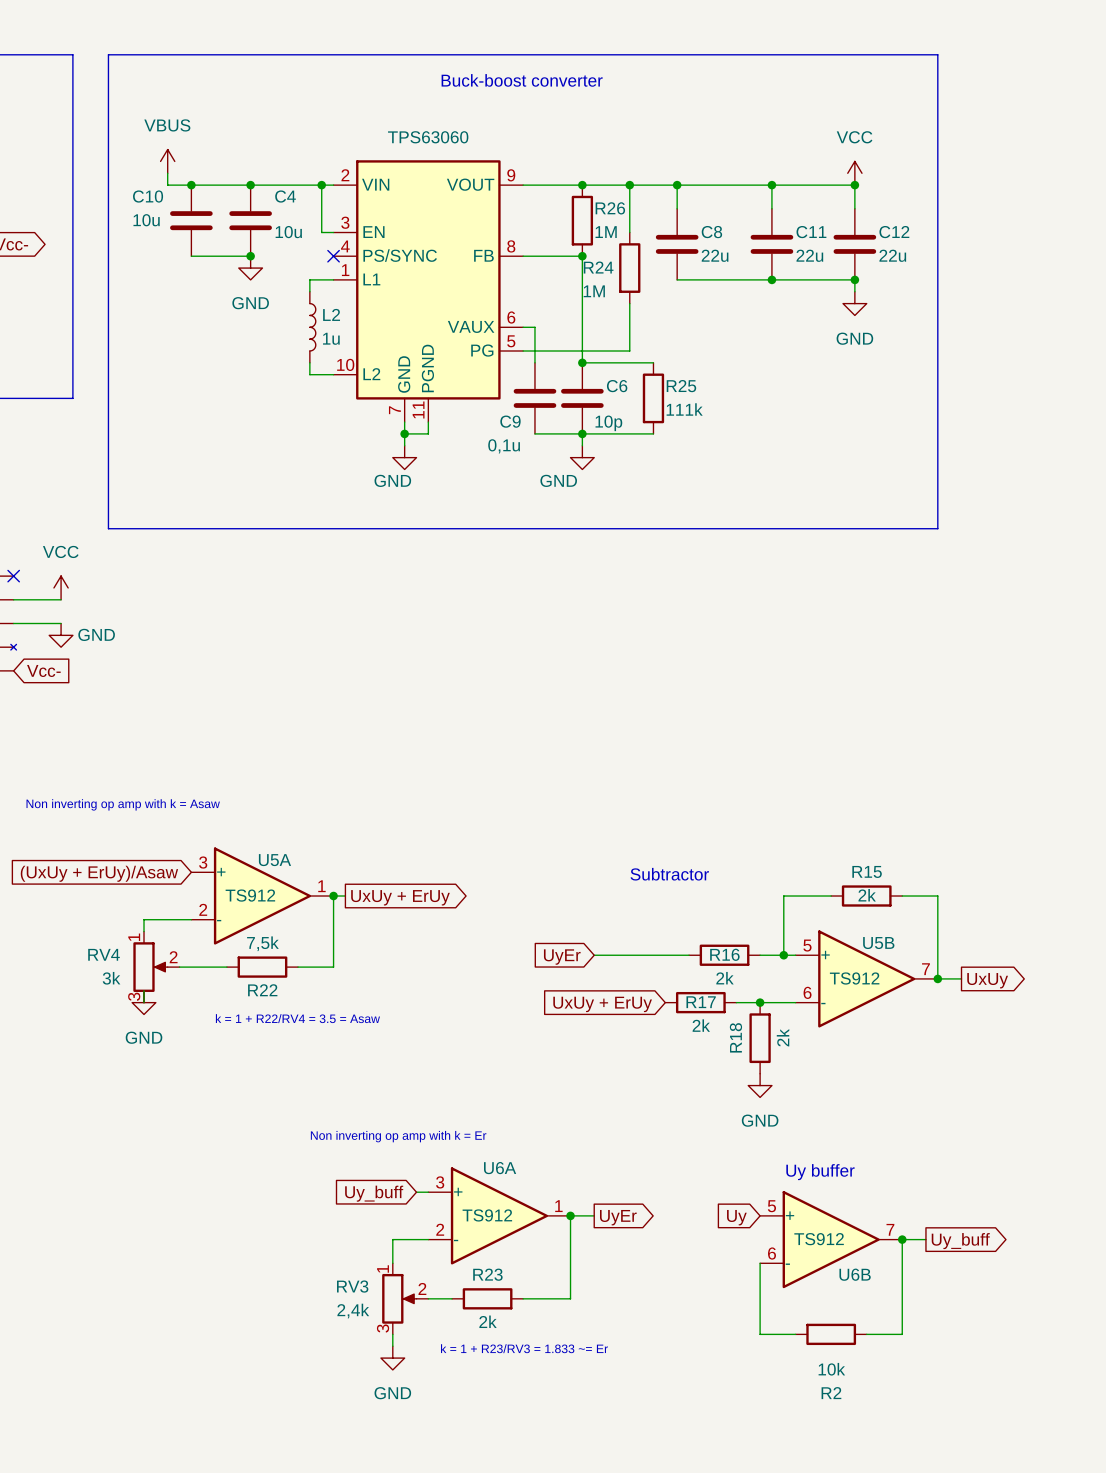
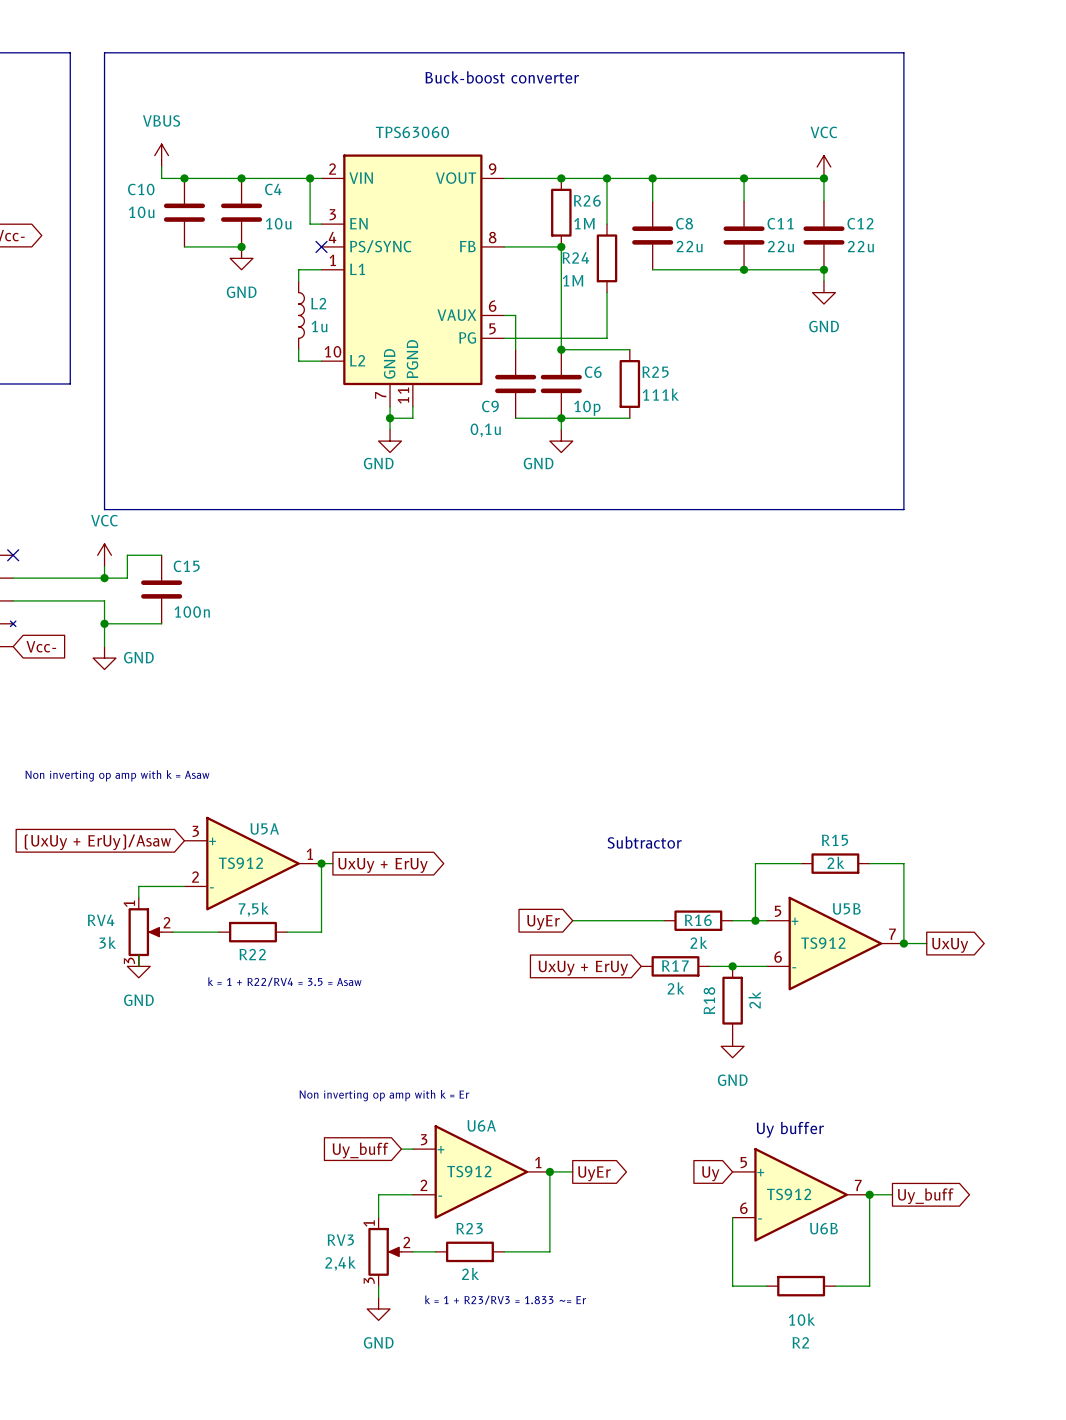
wire: none -> (161, 555) (127, 555) (127, 578) (58, 578)
power symbol position: VCC (61, 587) -> VCC (104, 555)
wire: none -> (104, 566) (104, 578)
junction: none -> (104, 578)
C15: none -> 100n (161, 589)
wire: none -> (58, 600) (104, 600) (104, 646)
power symbol position: GND (61, 635) -> GND (104, 658)
wire: none -> (104, 623) (161, 623)
junction: none -> (104, 623)

